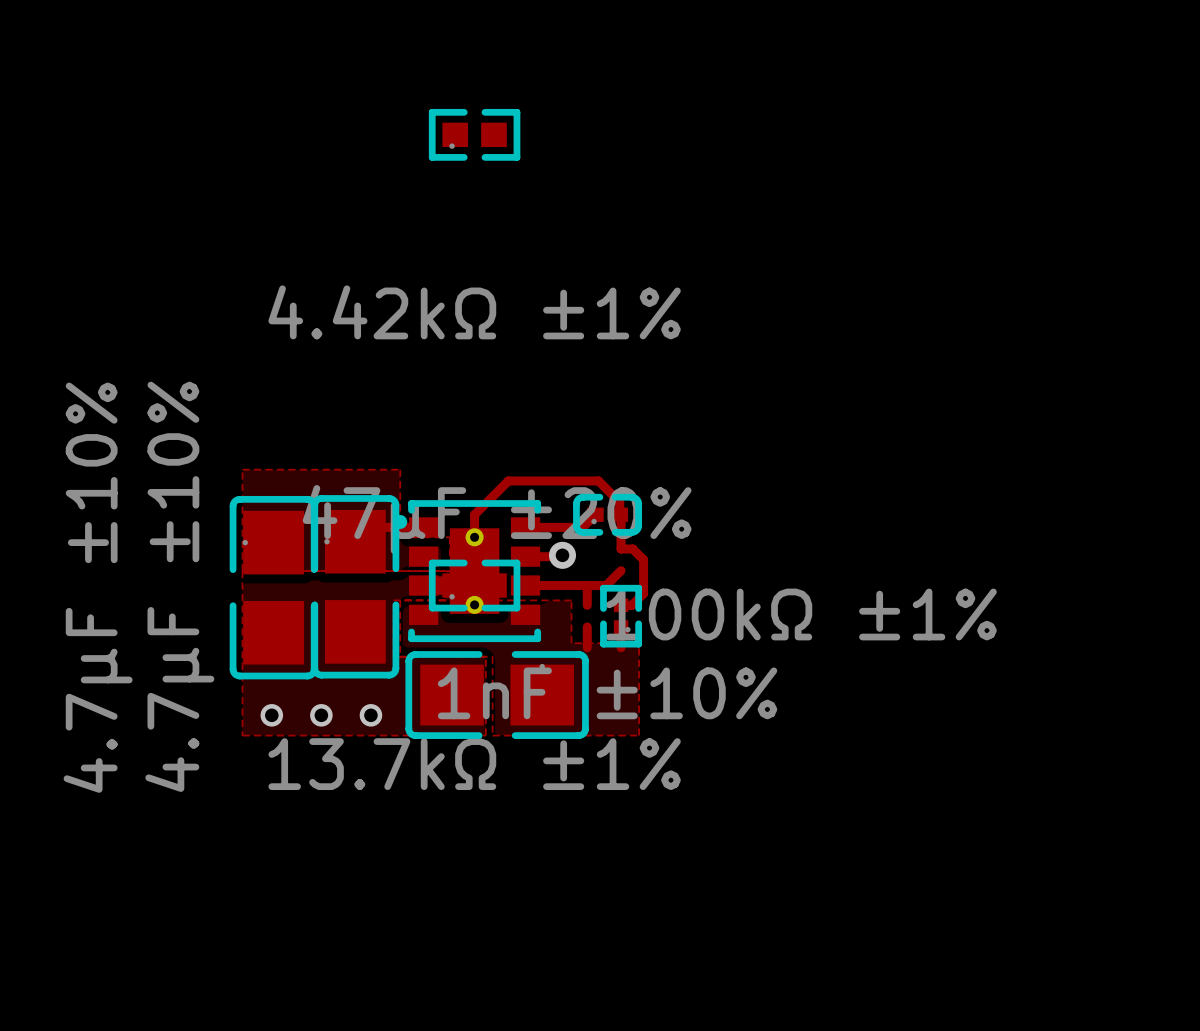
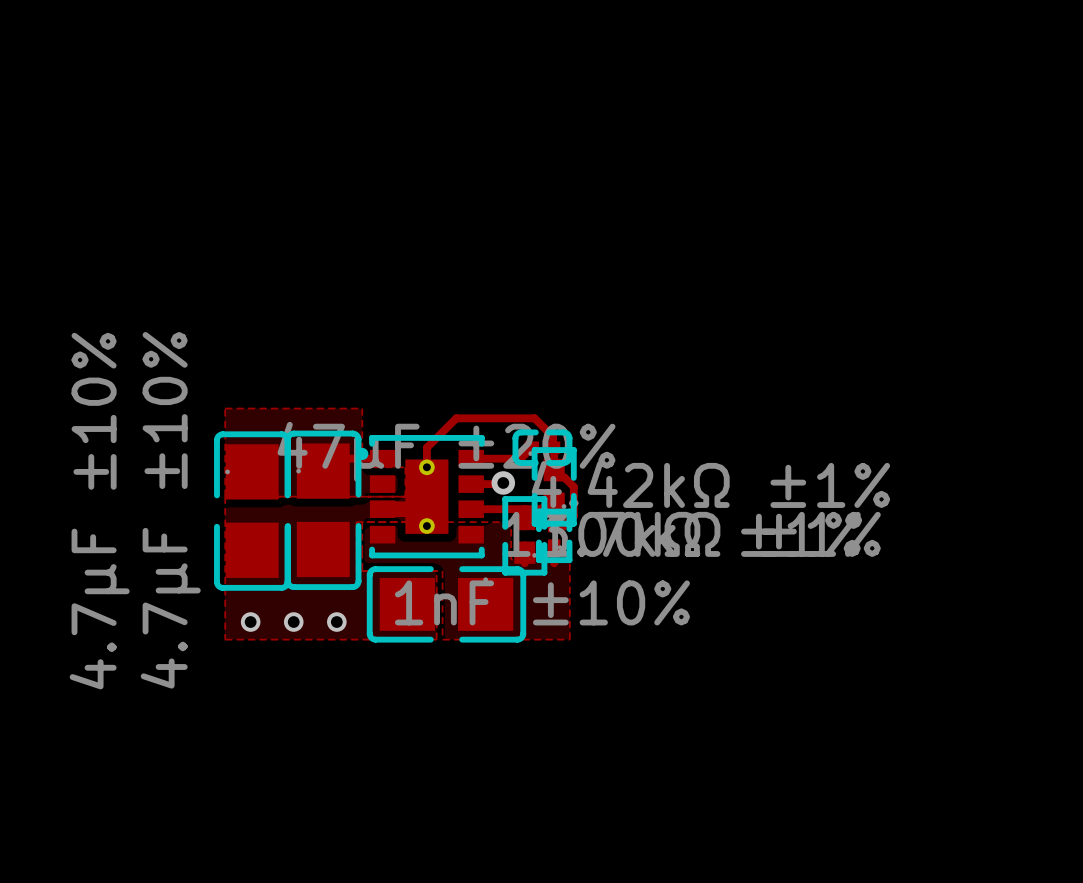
part rotation: 0° (474, 134) -> 90° counterclockwise (554, 486)
part position: (474, 134) -> (554, 486)
part rotation: 0° (474, 585) -> 90° counterclockwise (524, 535)
part position: (474, 585) -> (524, 535)

